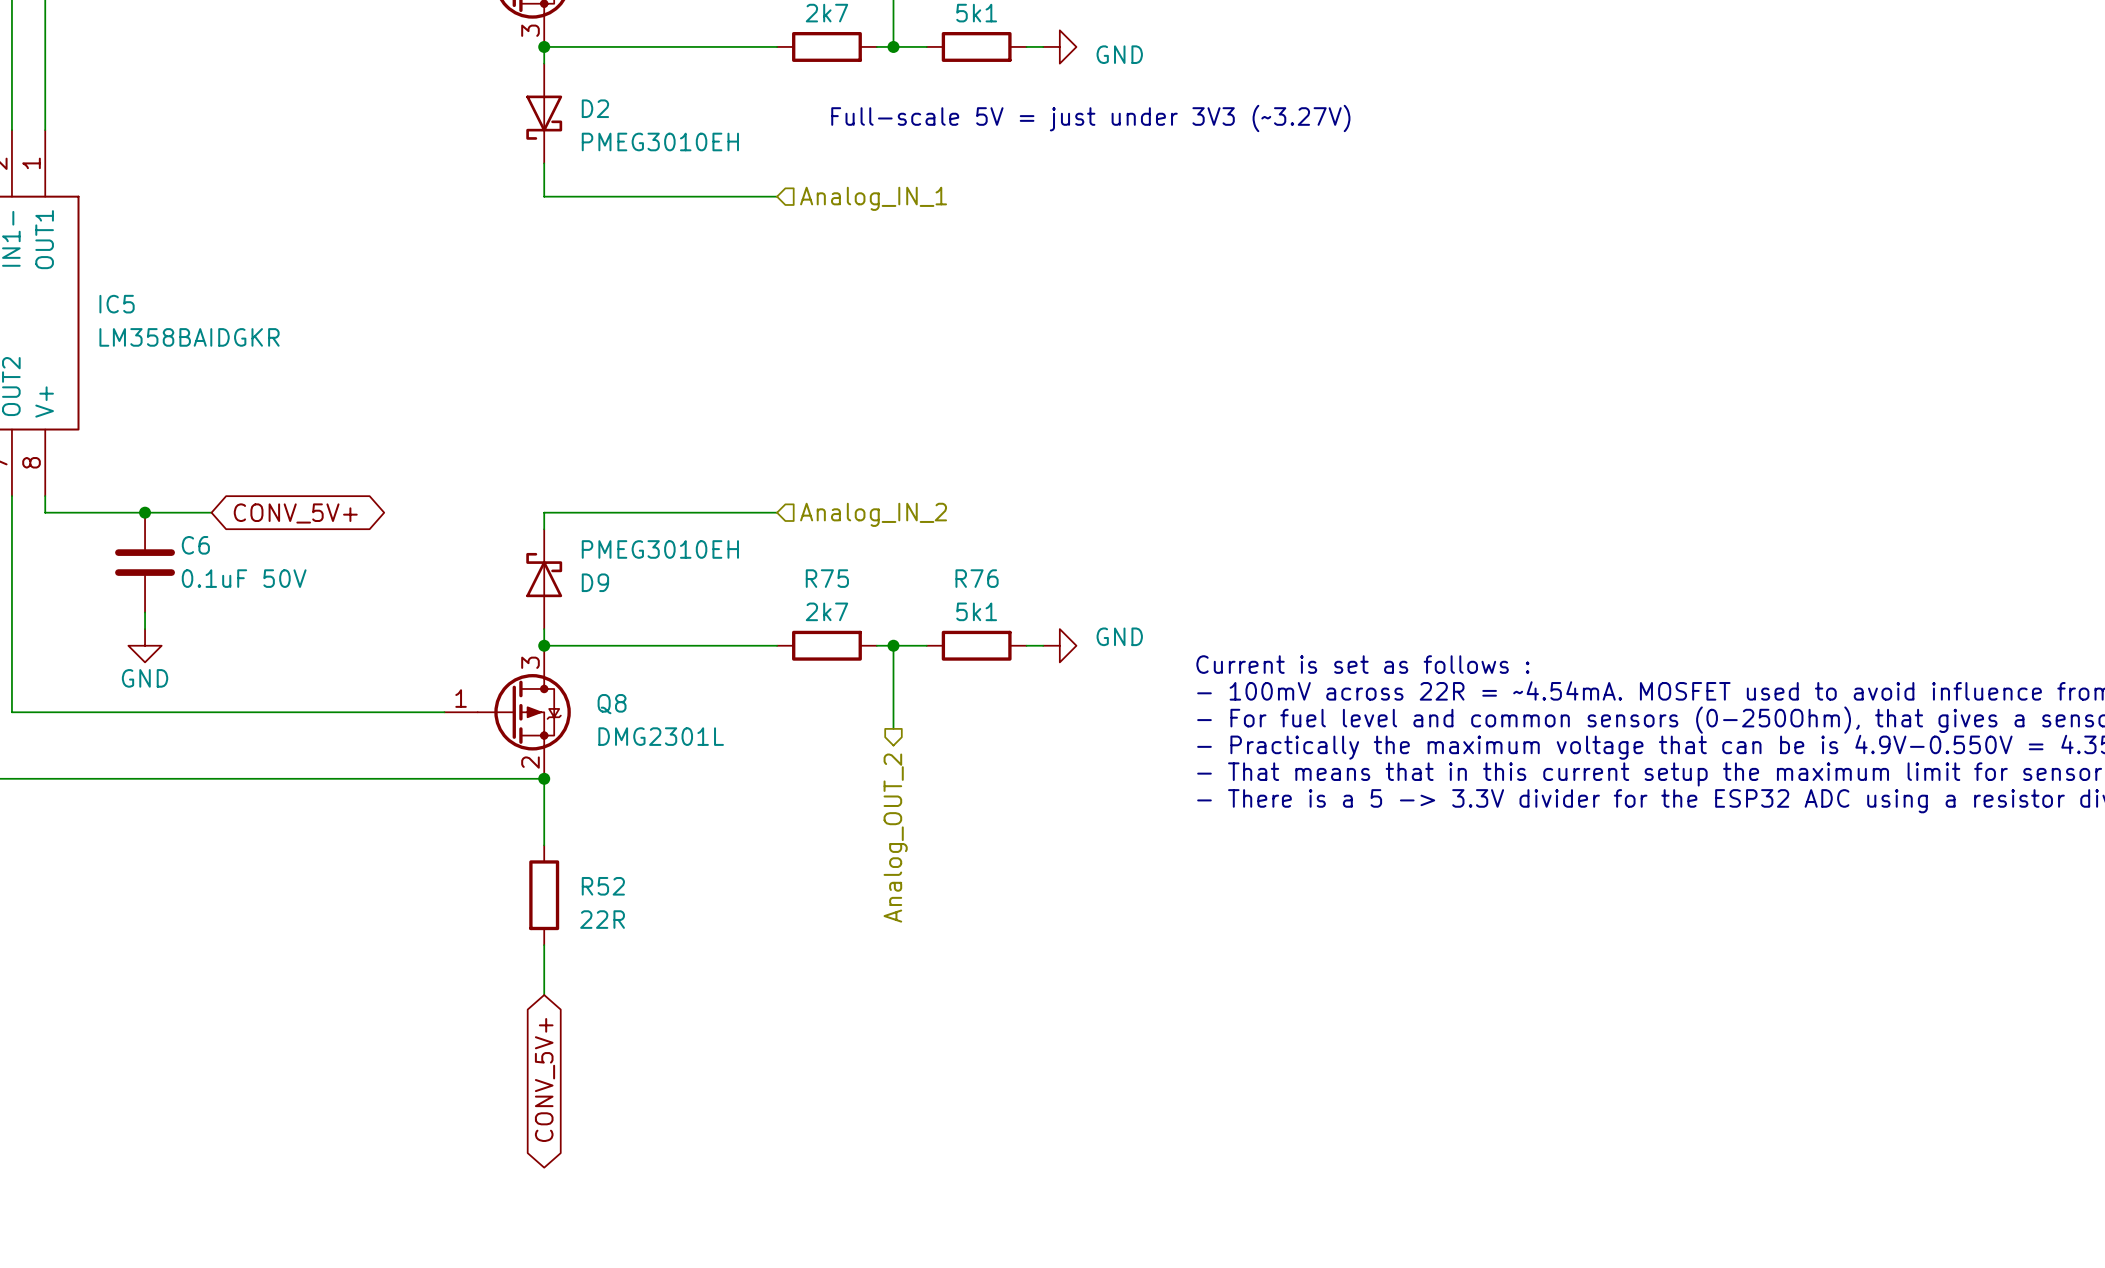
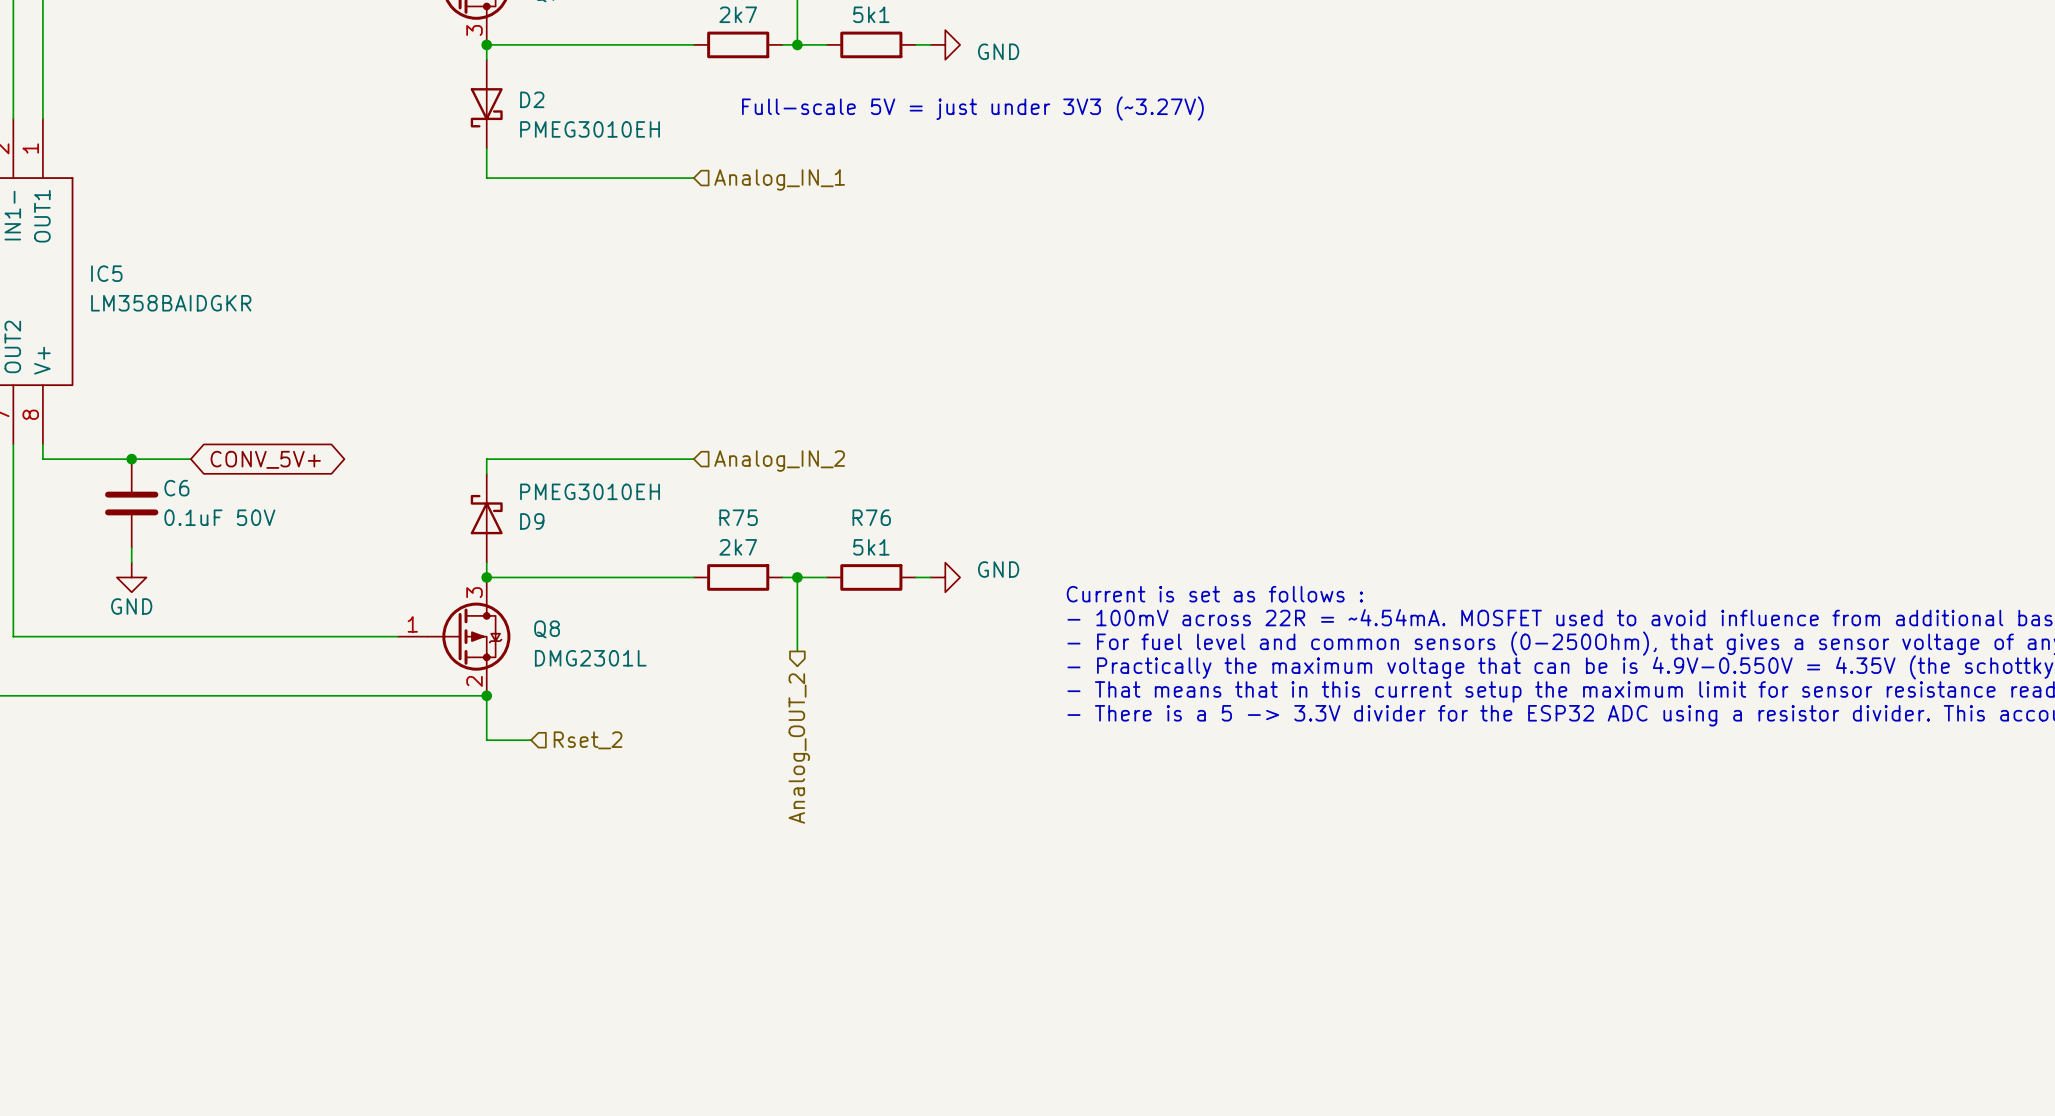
wire: (544, 828) (544, 845) -> (486, 740) (531, 740)
hierarchical label: none -> Rset_2 (588, 740)
R52: 22R (544, 895) -> none
wire: (544, 945) (544, 995) -> none
global label: CONV_5V+ (545, 1079) -> none

